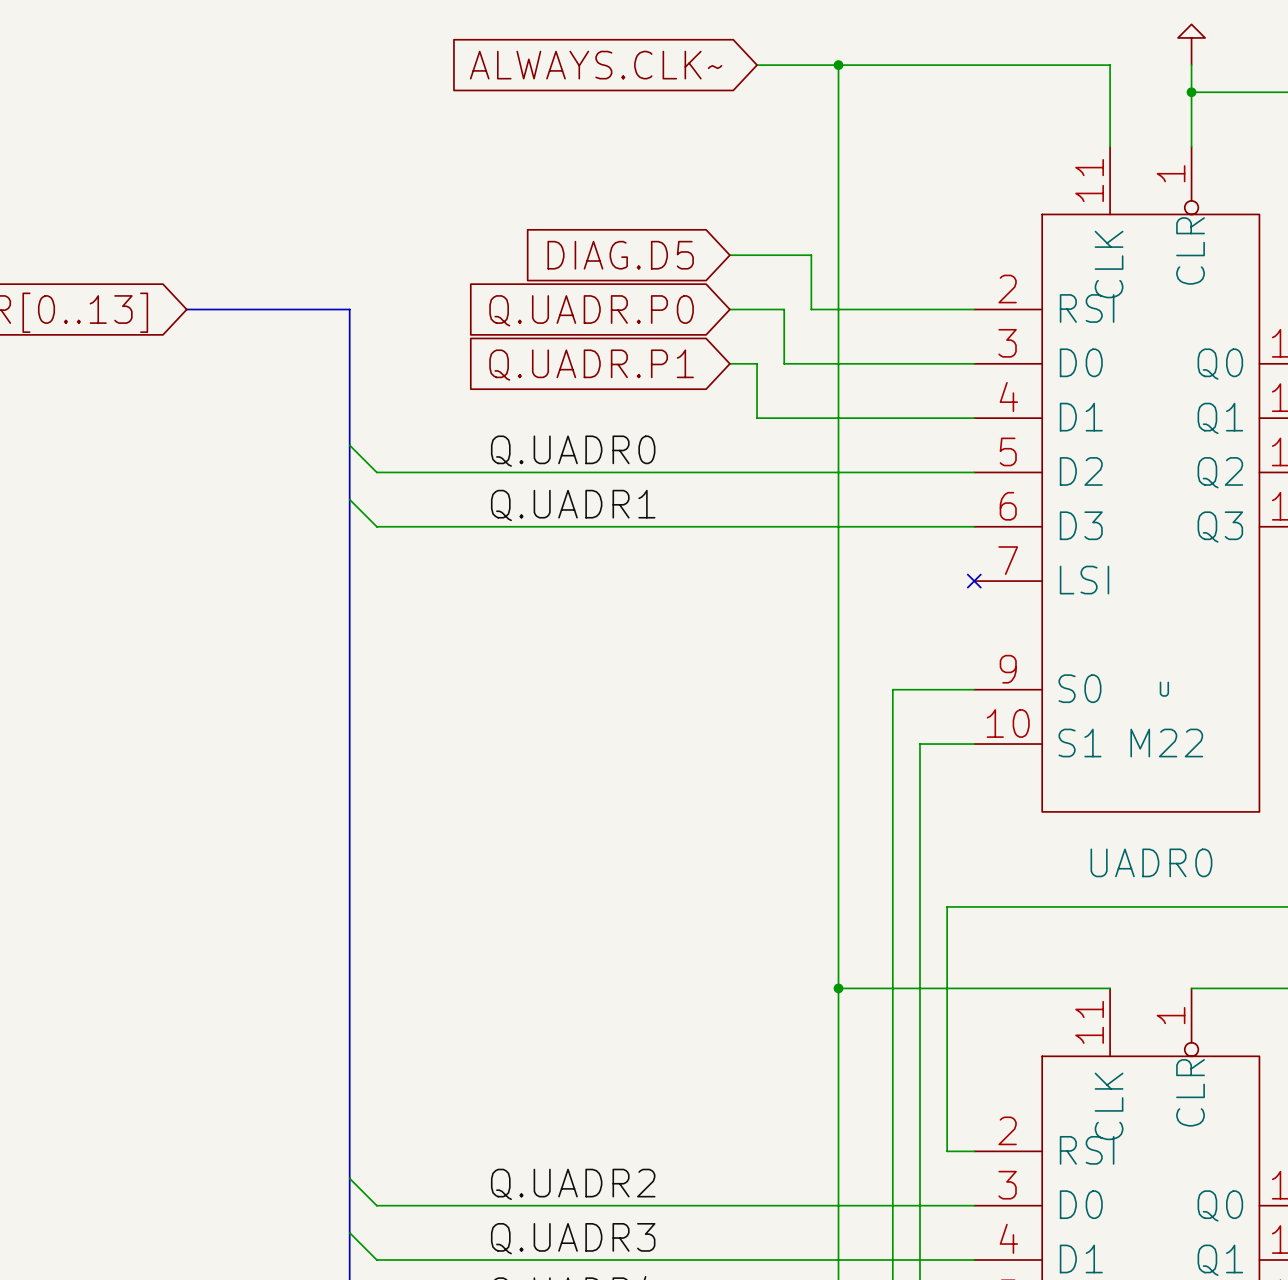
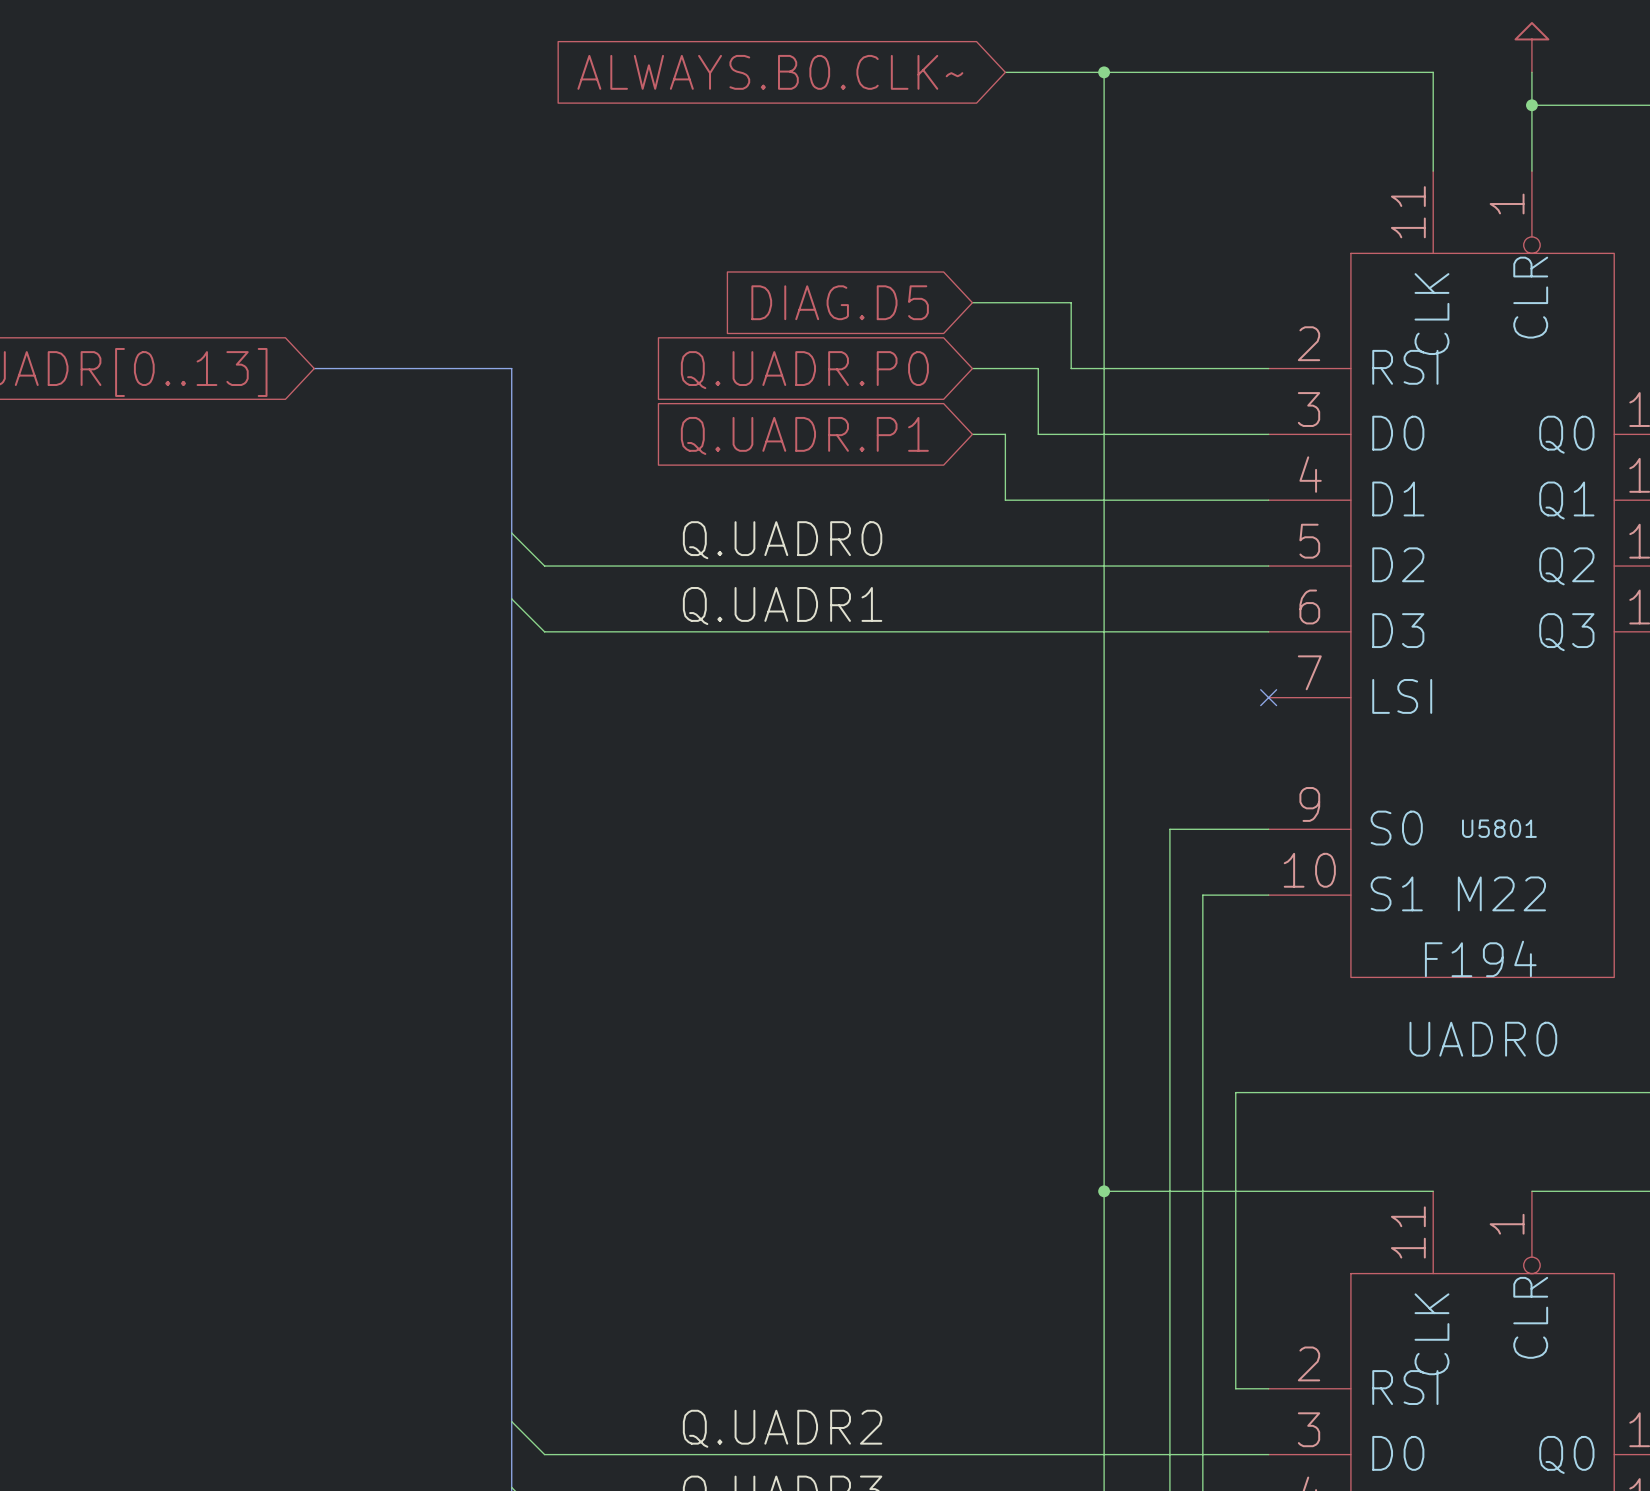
global label: ALWAYS.CLK~ (596, 65) -> ALWAYS.B0.CLK~ (770, 72)
U name: U (1164, 689) -> U5801 (1499, 828)
U value: none -> F194 (1480, 958)

